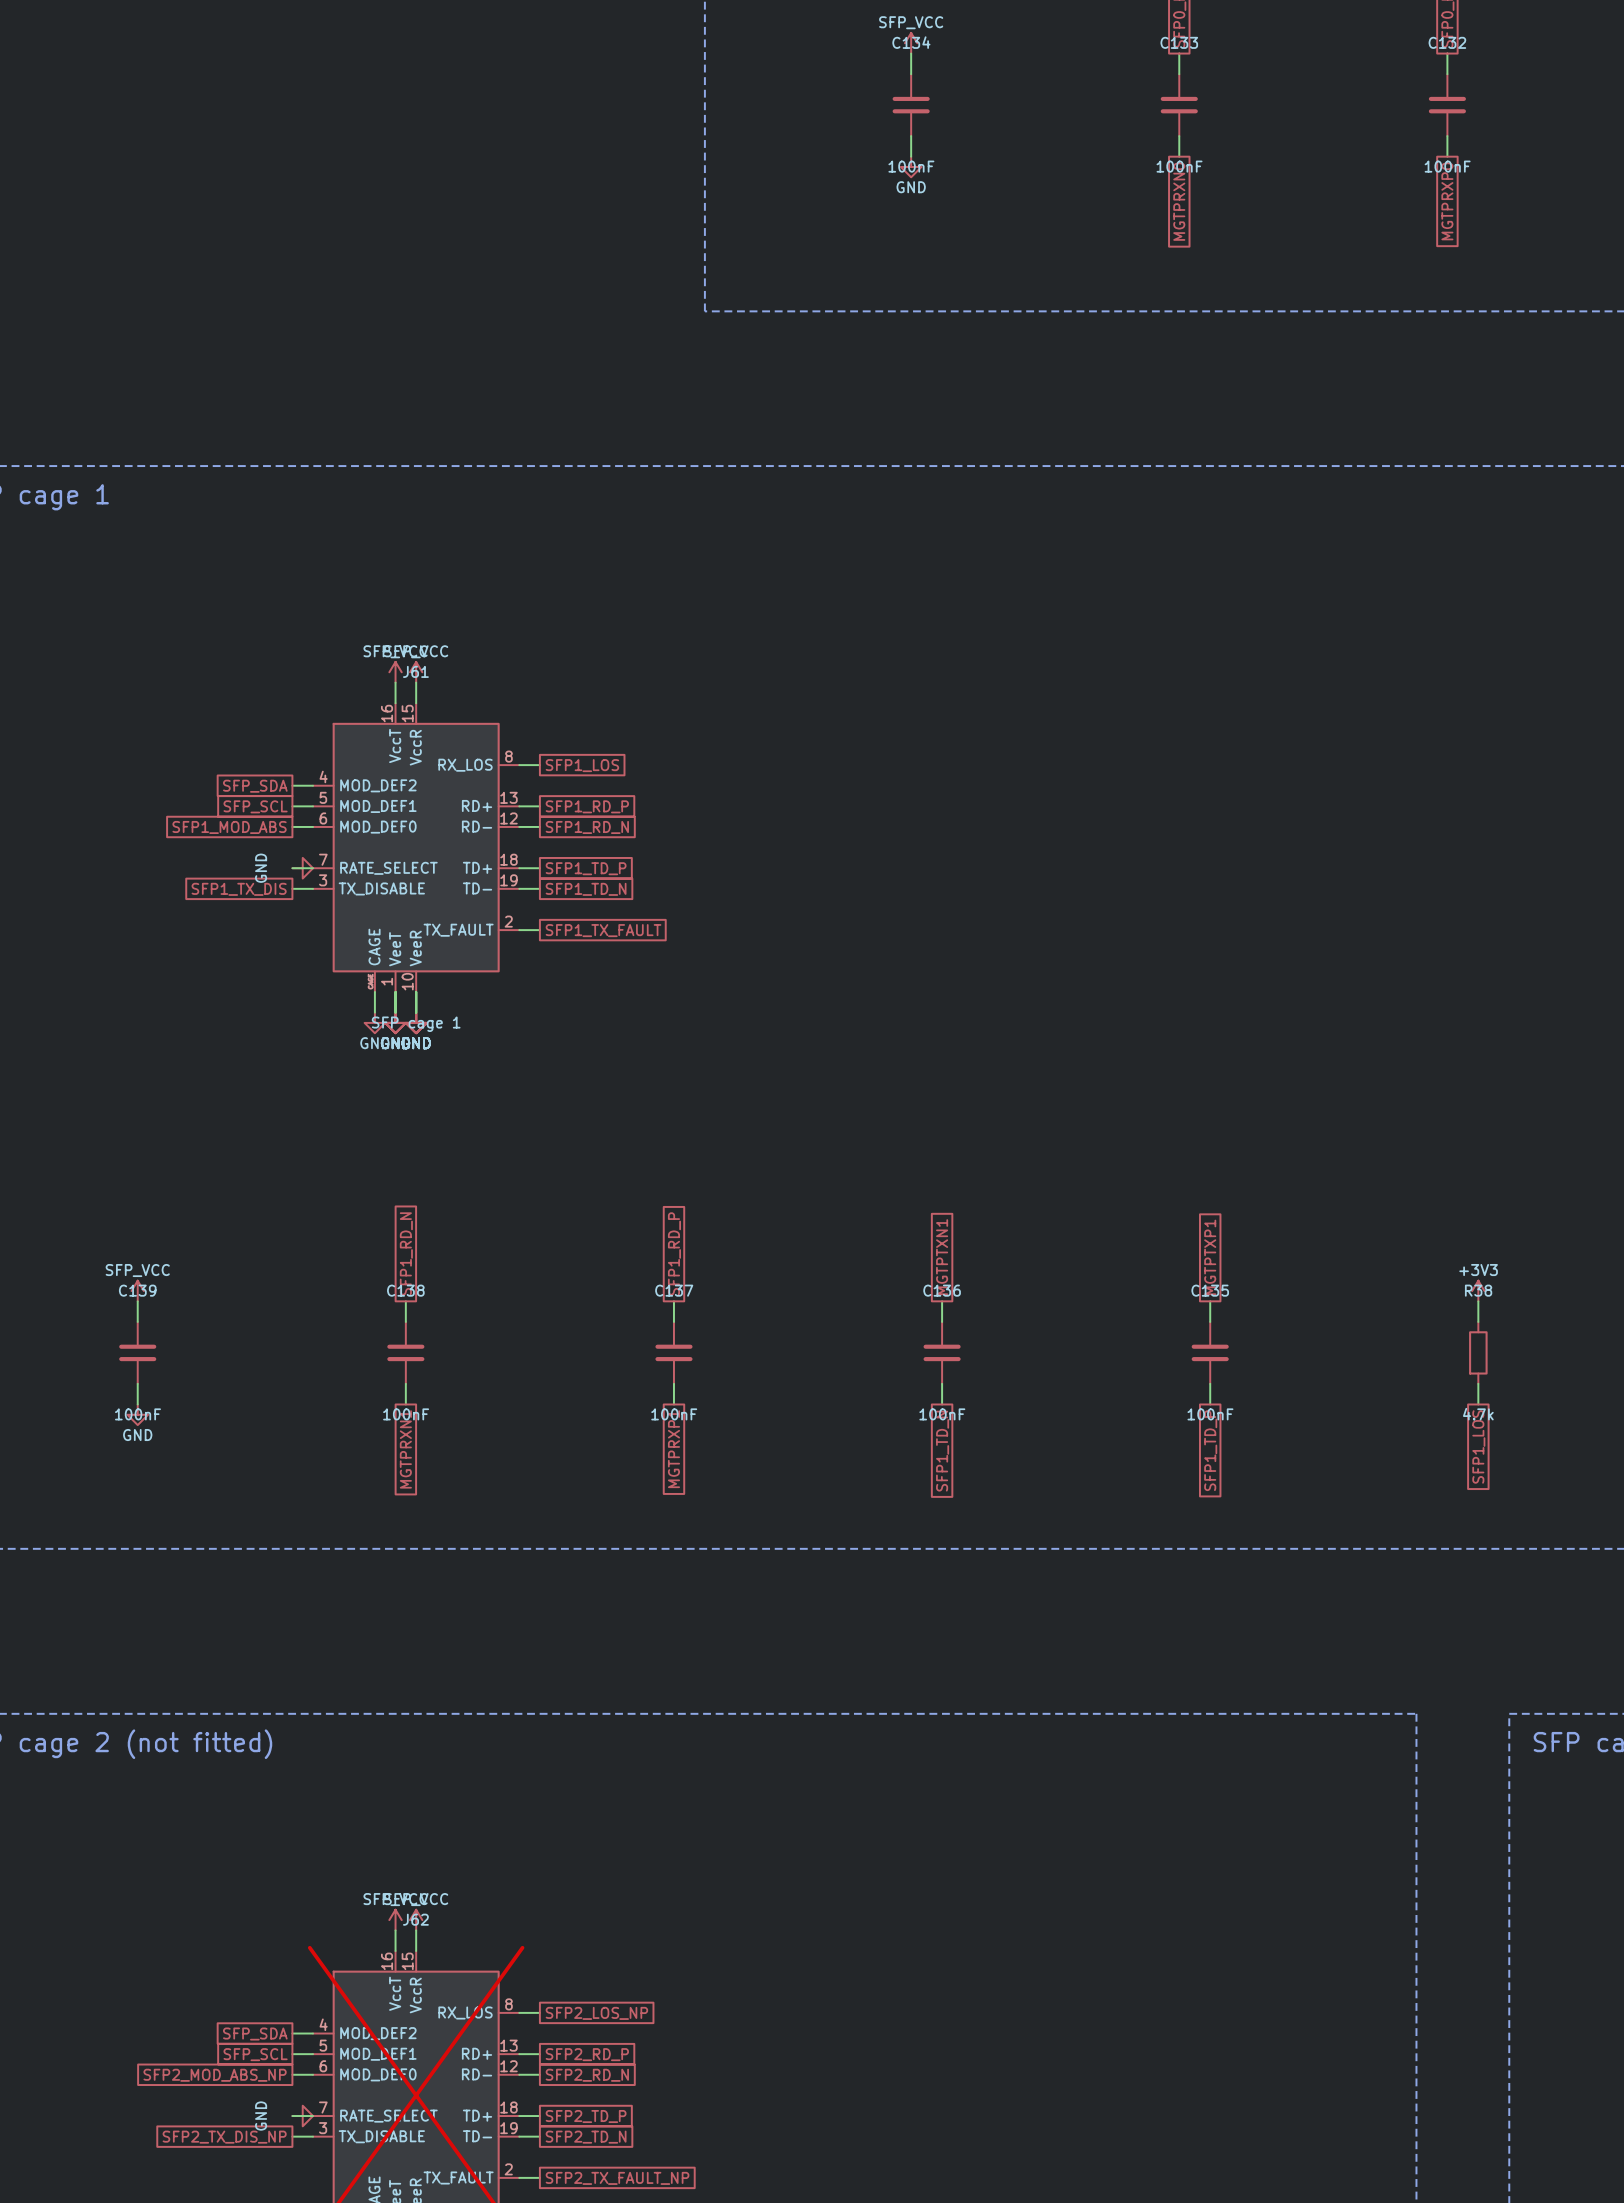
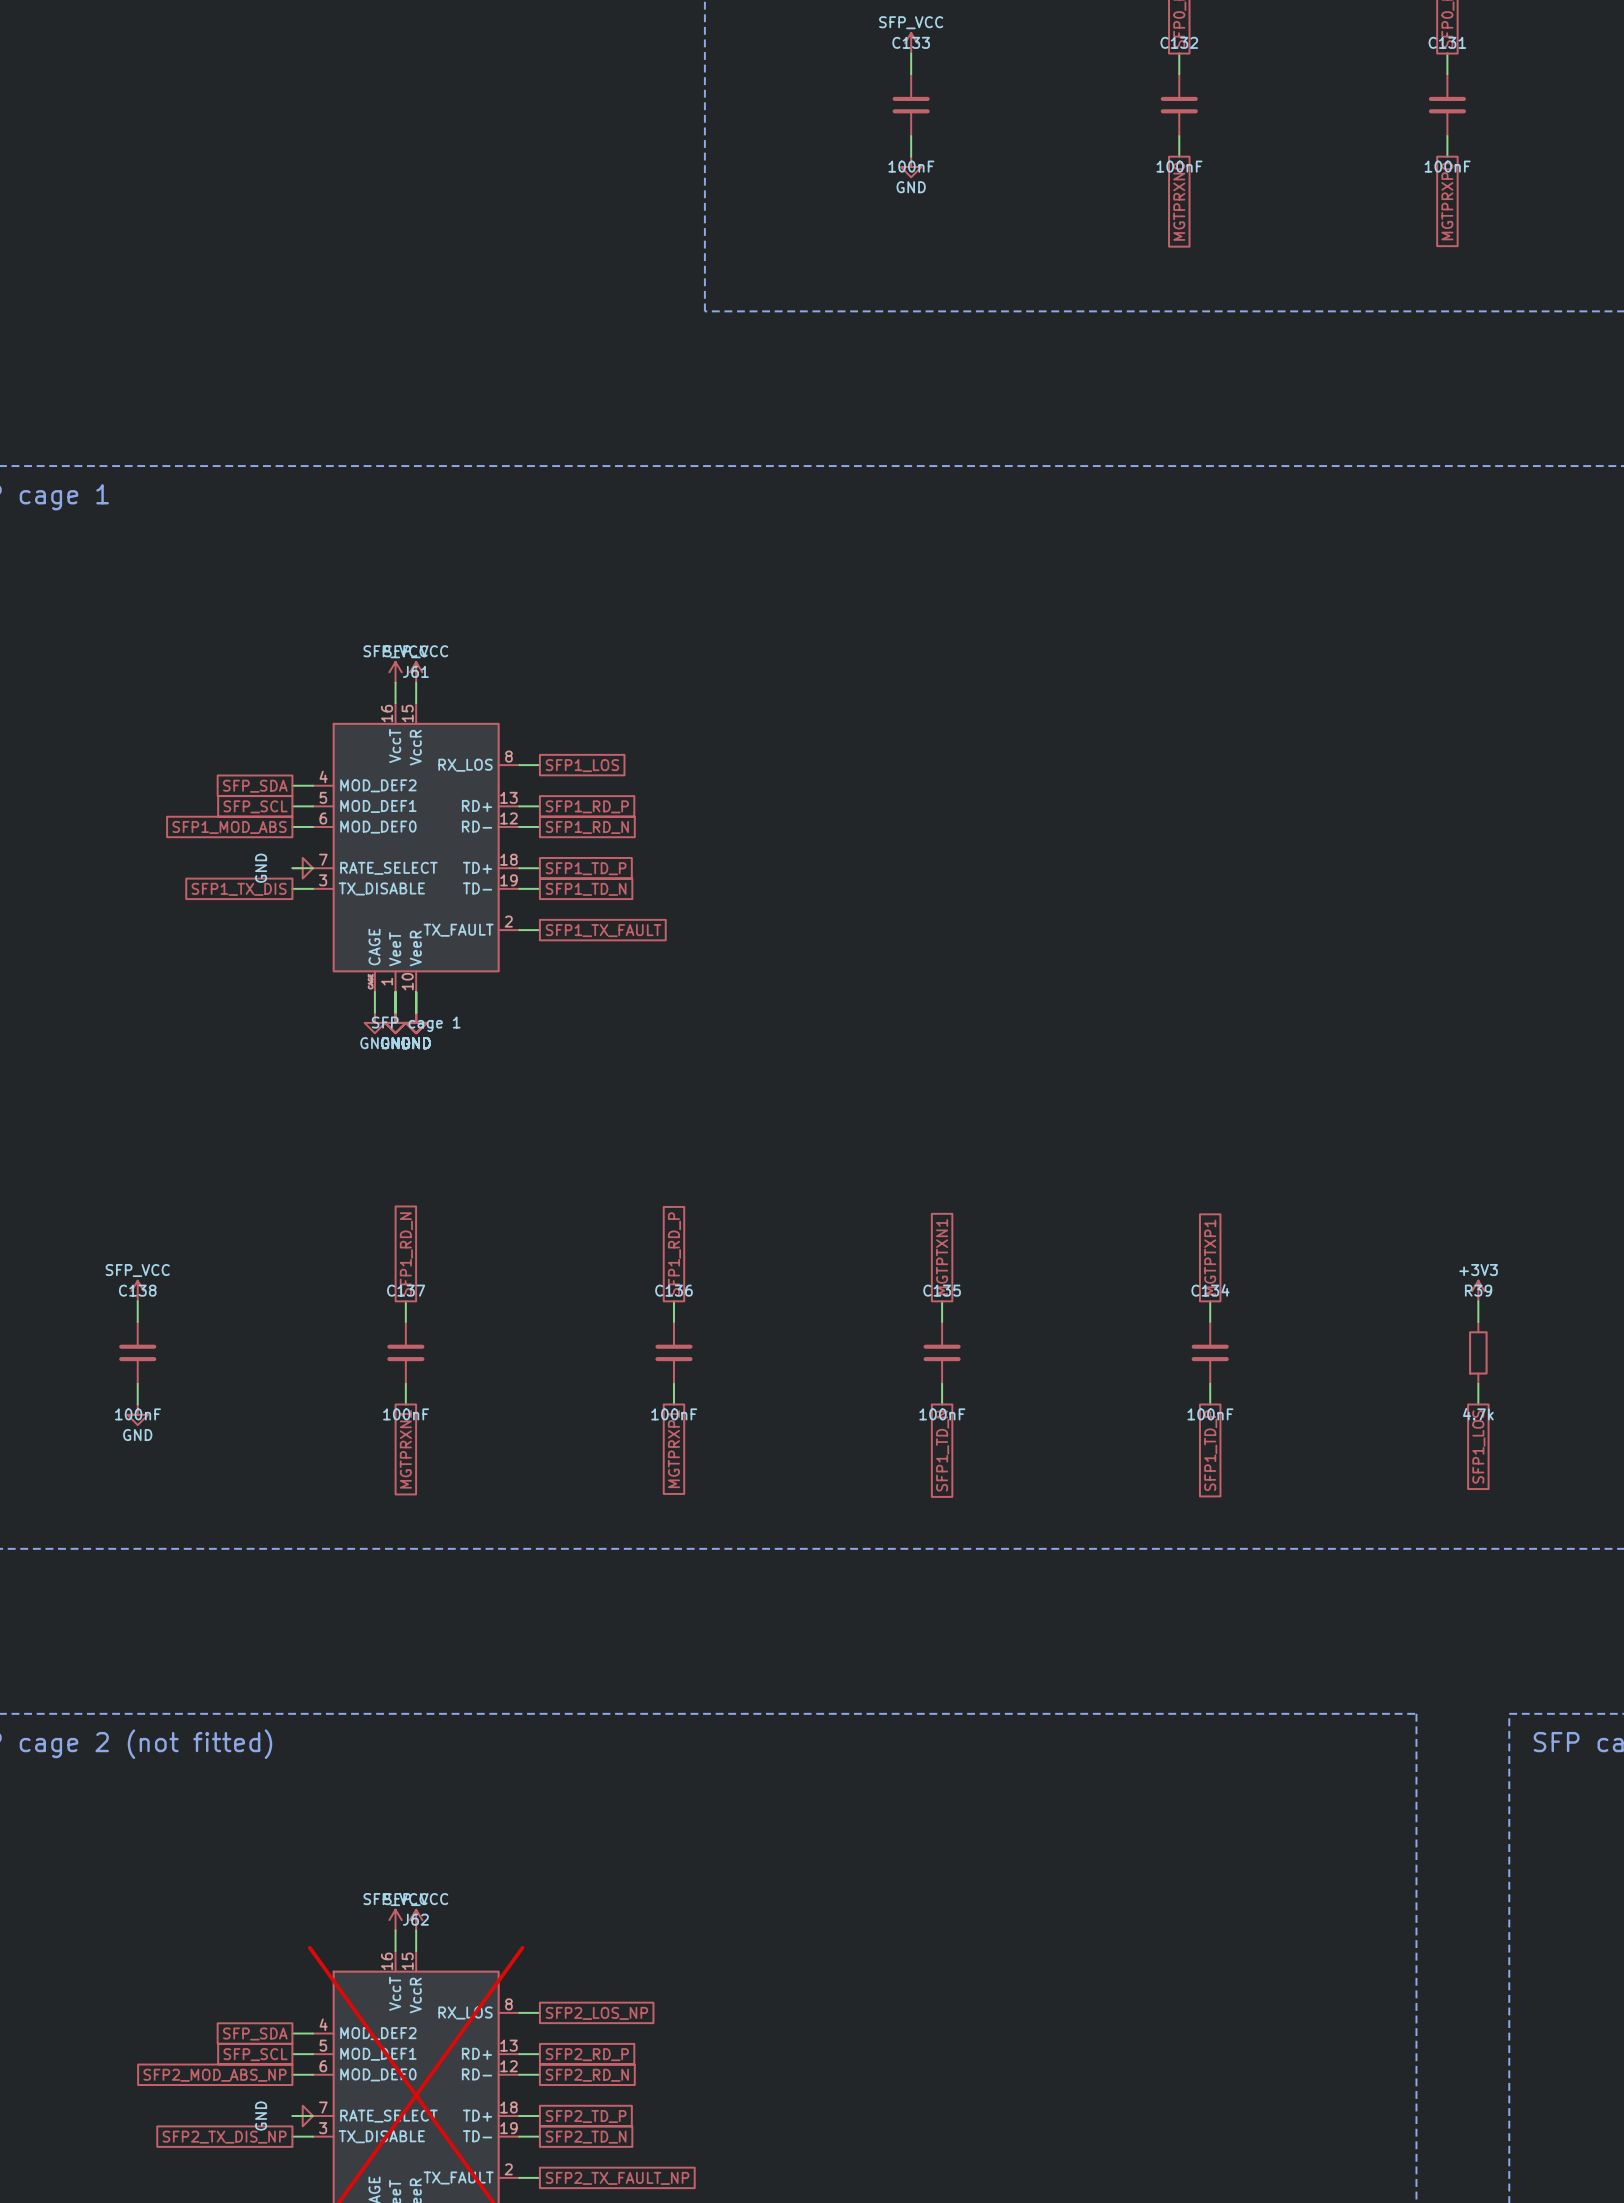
C134 name: C134 (911, 42) -> C133 (911, 42)
C133 name: C133 (1179, 42) -> C132 (1179, 42)
C132 name: C132 (1447, 42) -> C131 (1447, 42)
C139 name: C139 (137, 1290) -> C138 (137, 1290)
C138 name: C138 (405, 1290) -> C137 (406, 1290)
C137 name: C137 (674, 1290) -> C136 (673, 1290)
C136 name: C136 (942, 1290) -> C135 (942, 1290)
C135 name: C135 (1210, 1290) -> C134 (1210, 1290)
R38 name: R38 (1478, 1290) -> R39 (1478, 1290)

